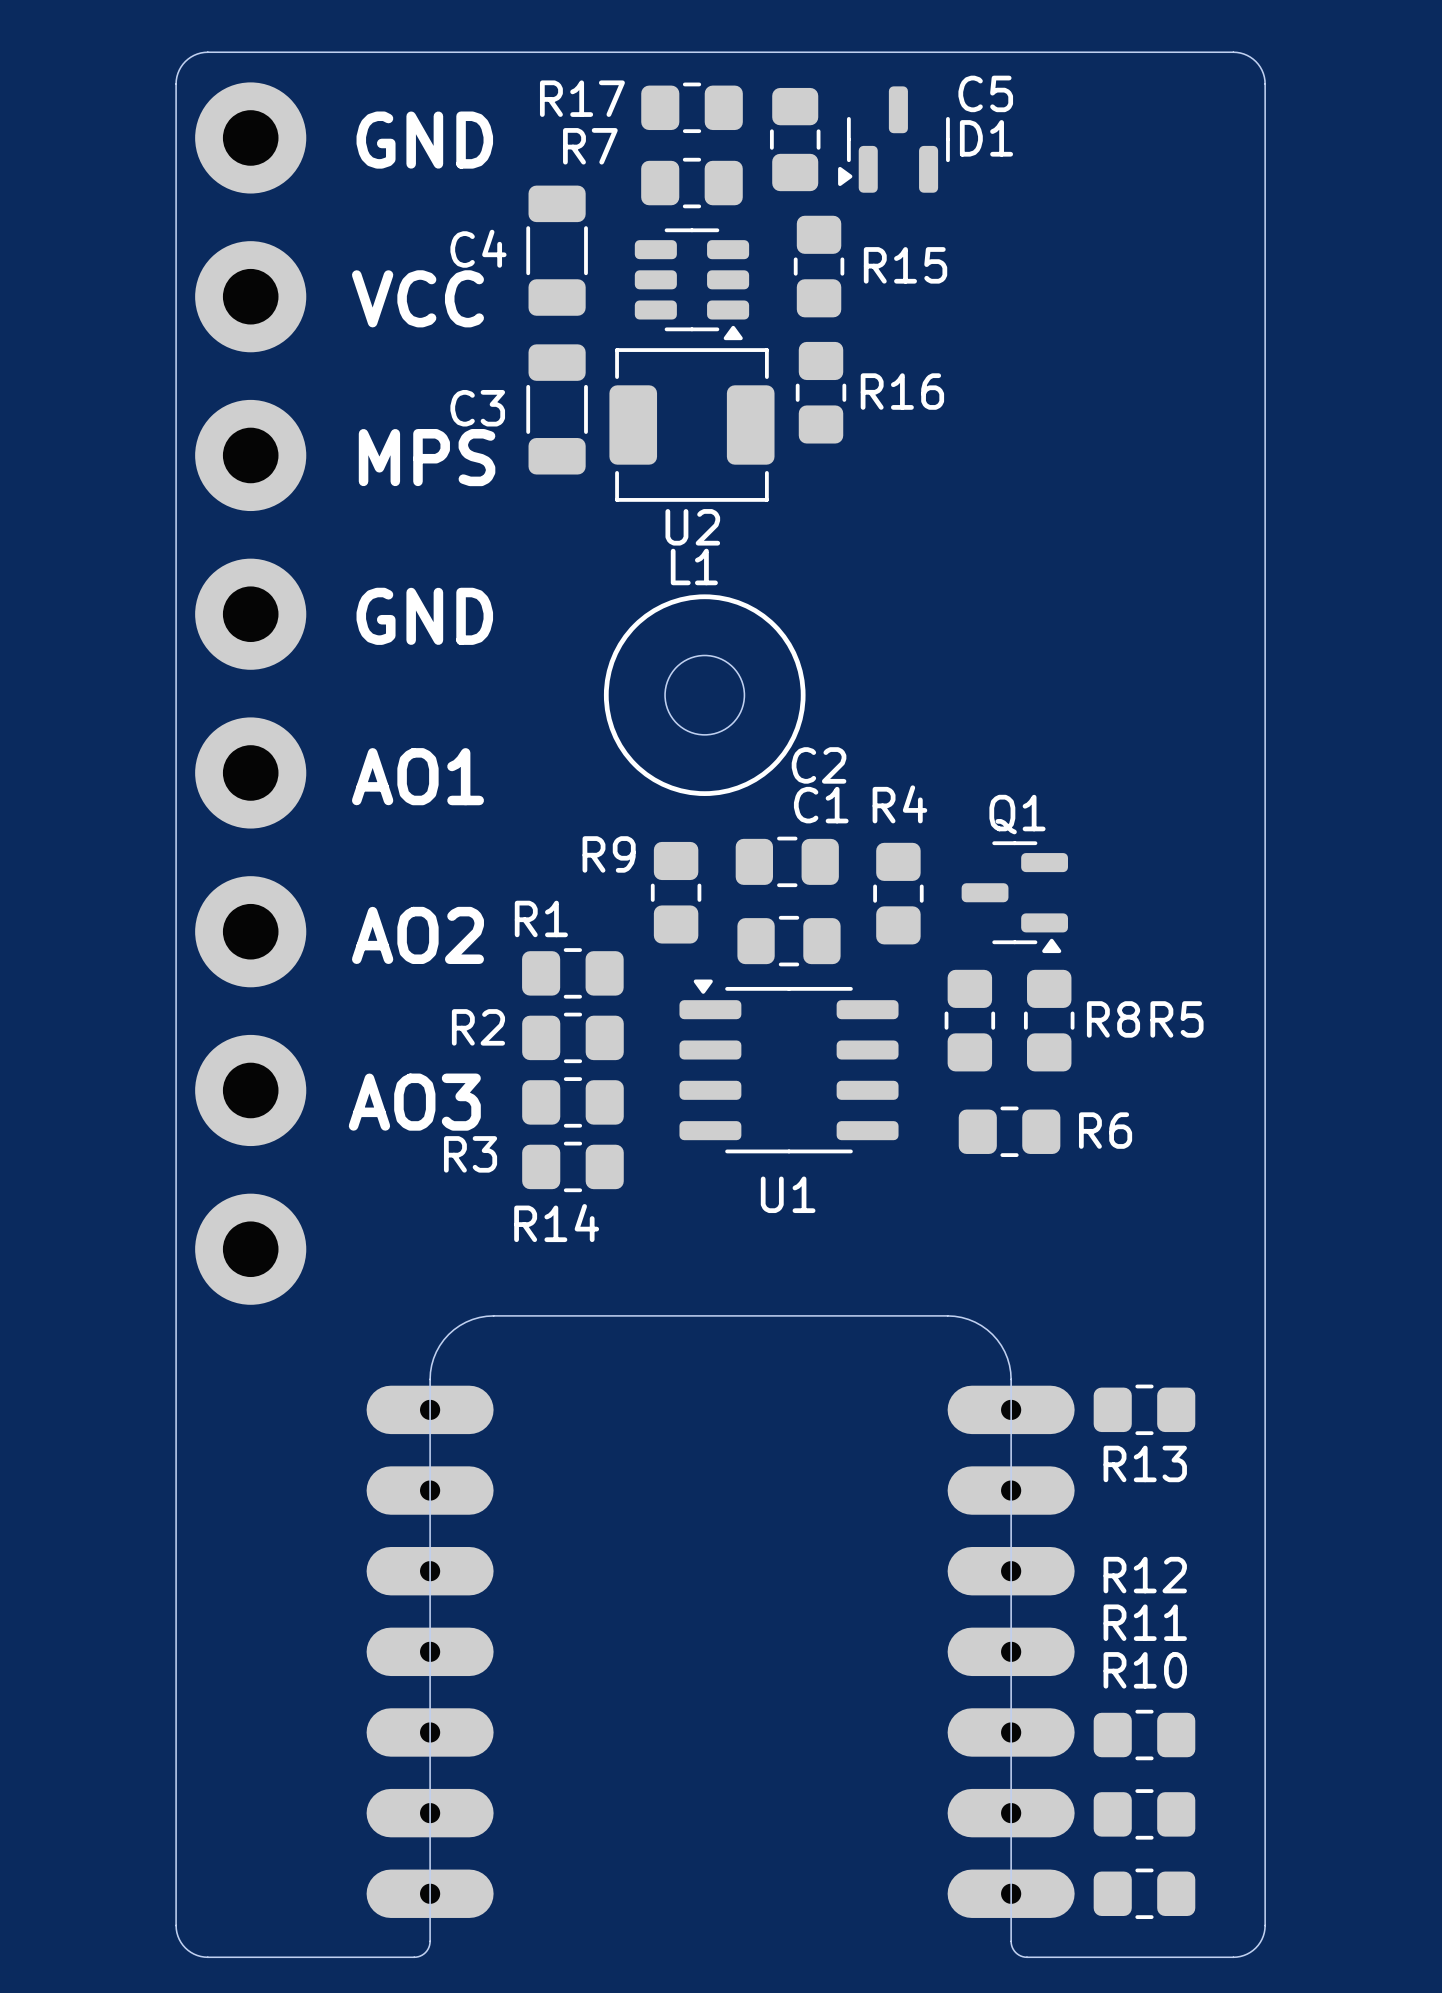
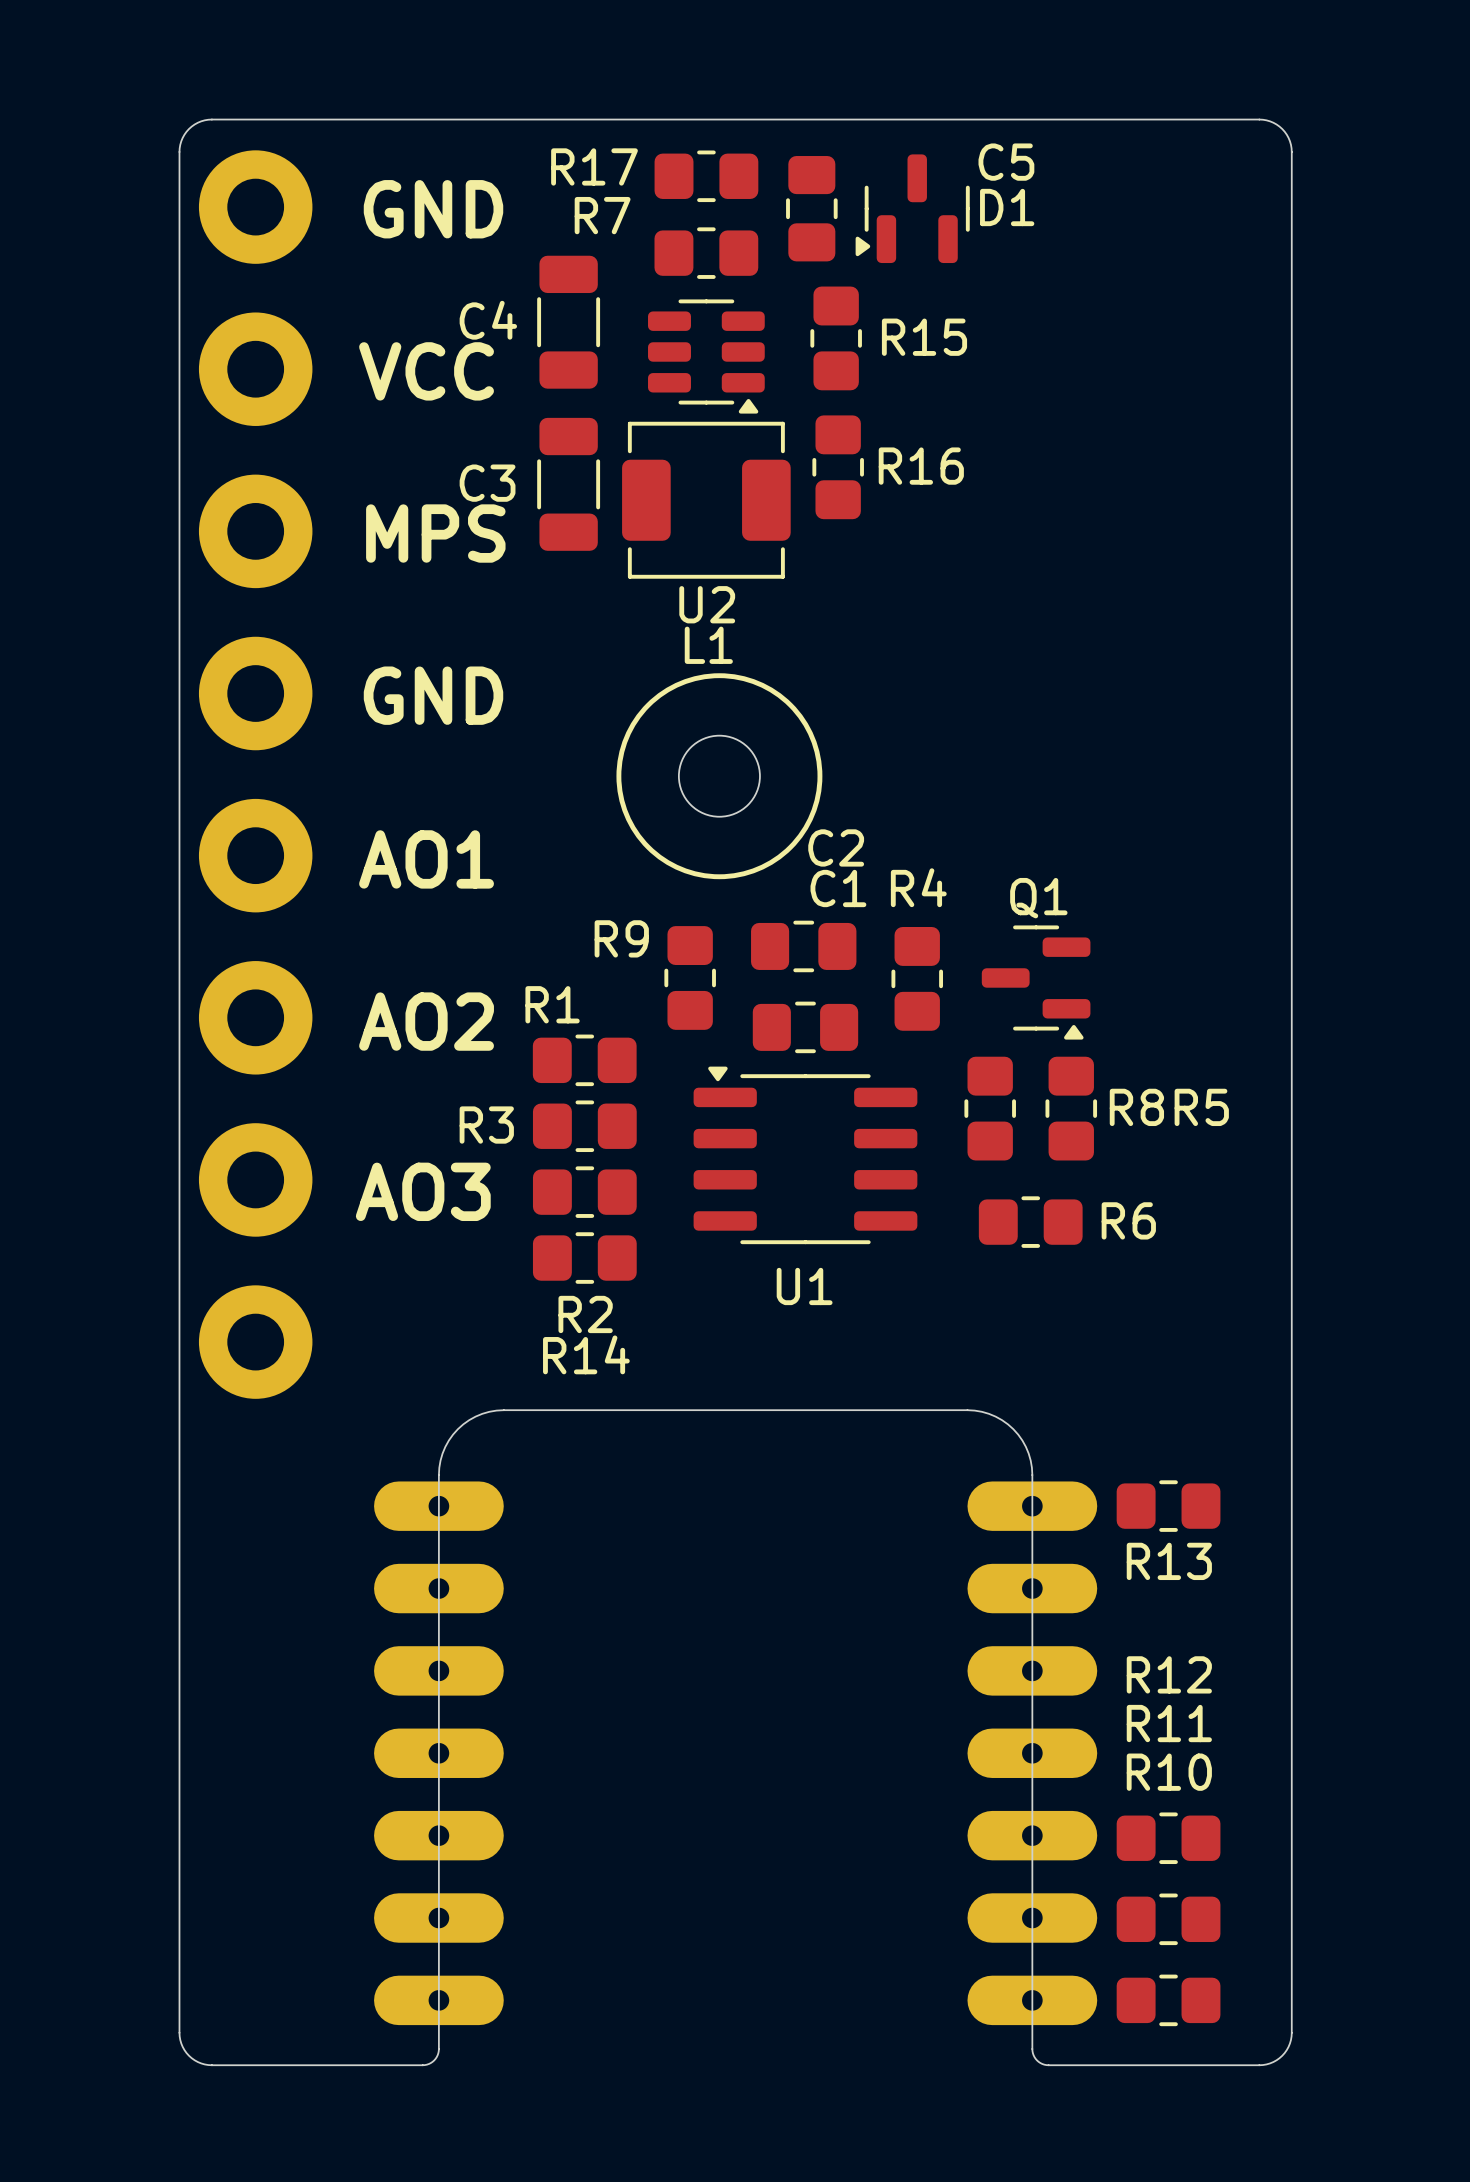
R2 name: R2 (478, 1027) -> R3 (486, 1125)
R3 name: R3 (470, 1154) -> R2 (585, 1314)
R14 name position: R14 (556, 1223) -> R14 (586, 1354)

